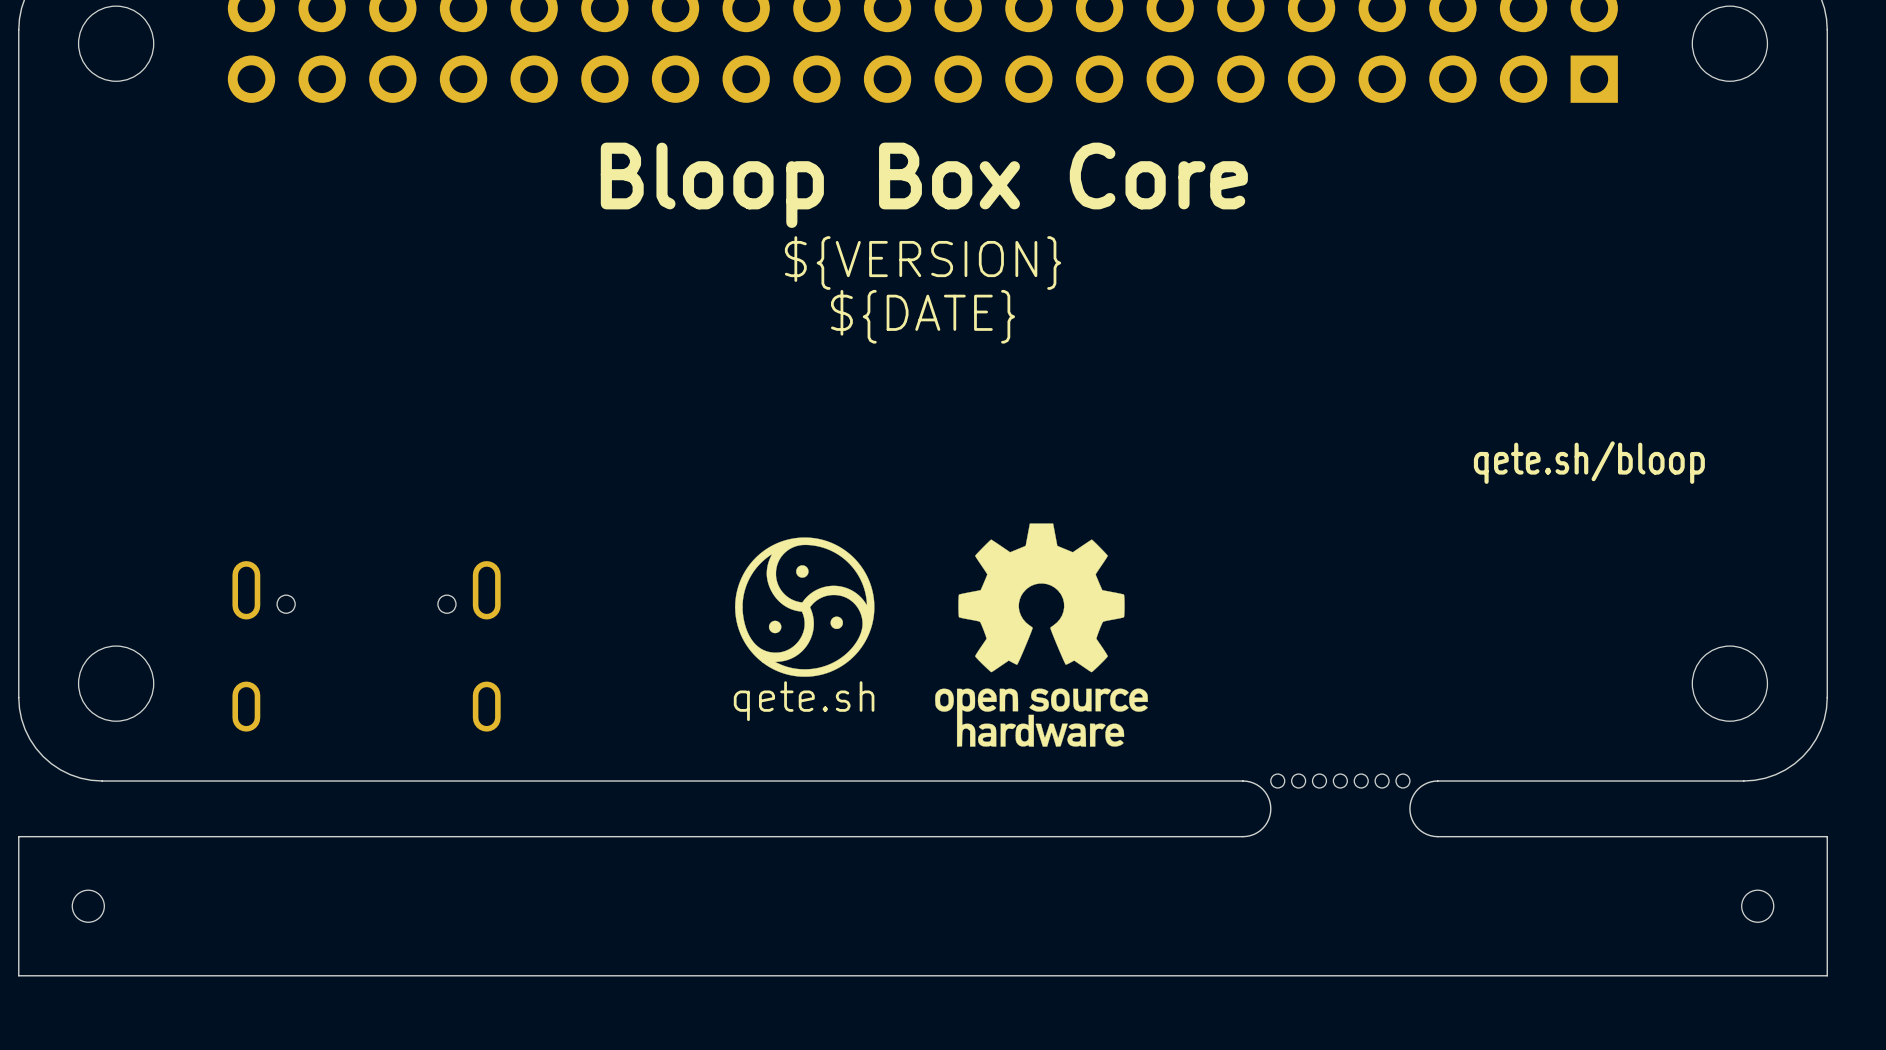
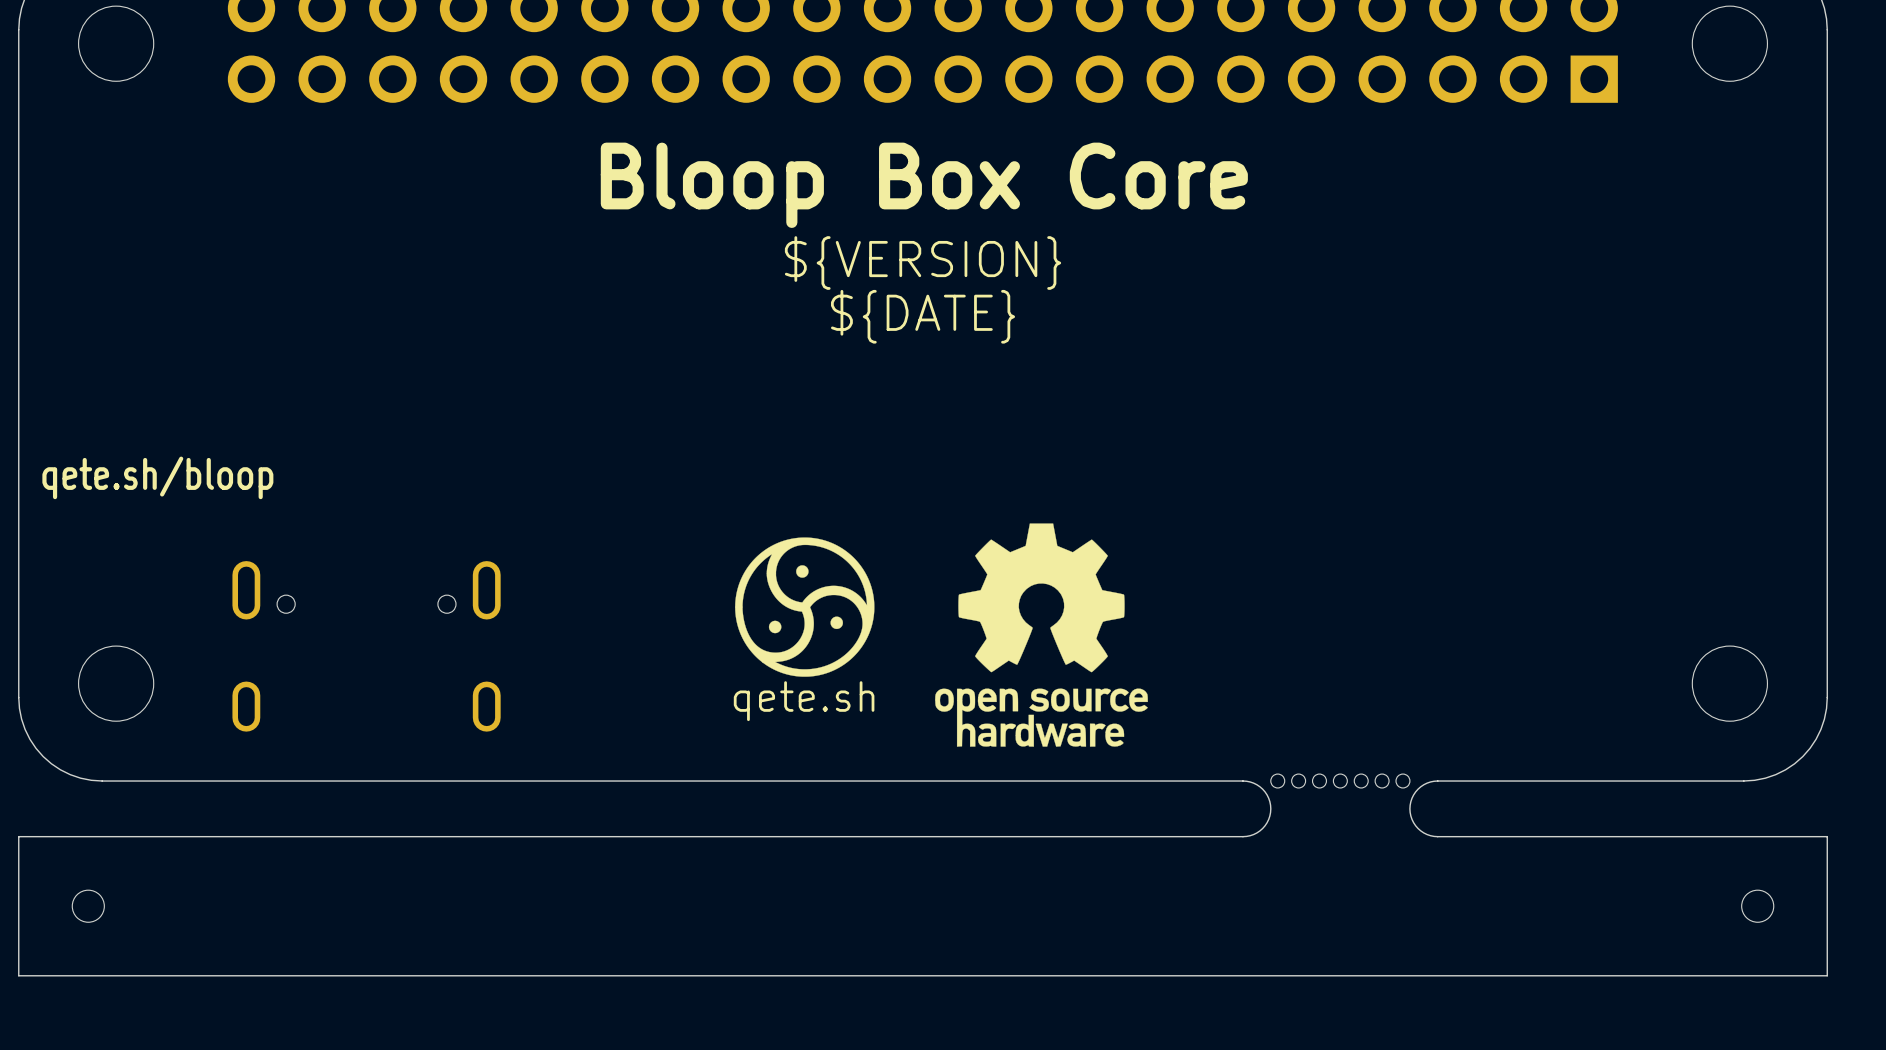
text: qete.sh/bloop (1589, 462) -> none
text: none -> qete.sh/bloop (157, 477)

